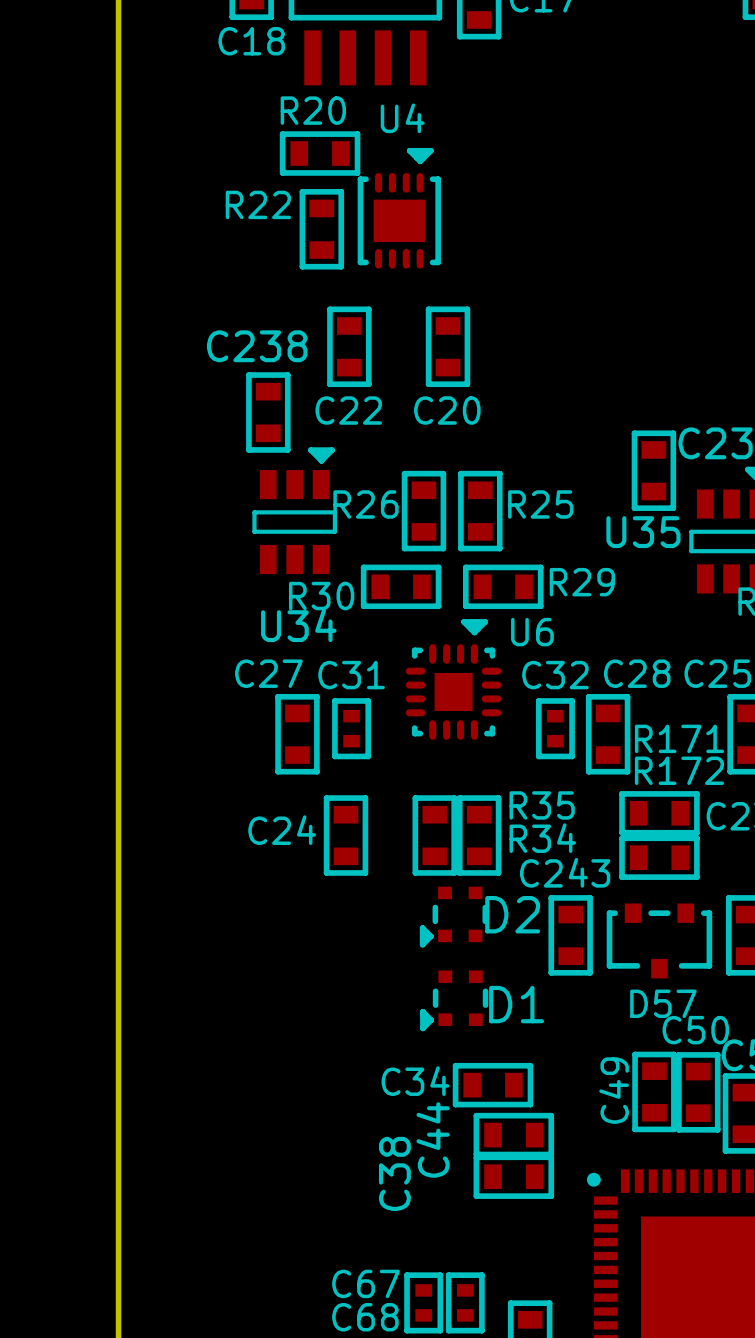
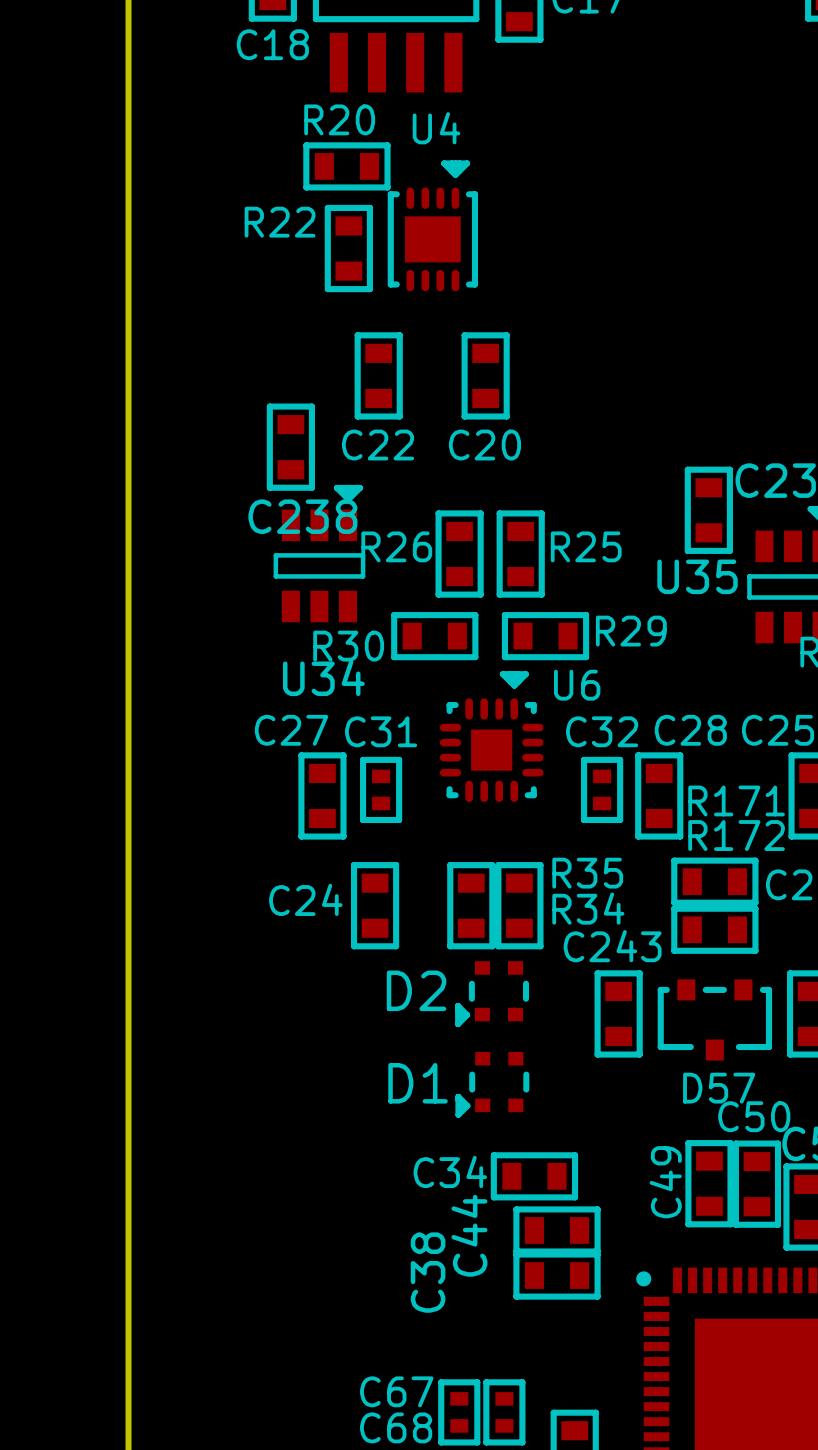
C238 name position: C238 (257, 346) -> C238 (302, 516)
D2 name position: D2 (512, 914) -> D2 (416, 990)
D1 name position: D1 (516, 1004) -> D1 (418, 1083)

